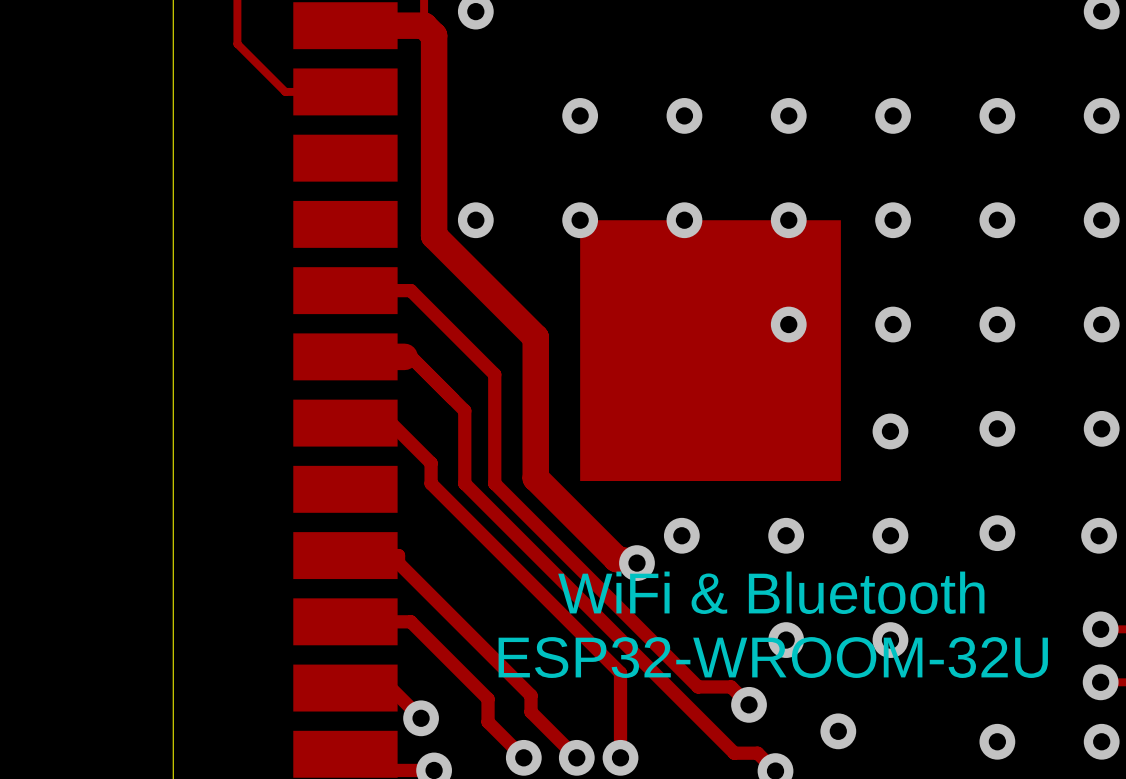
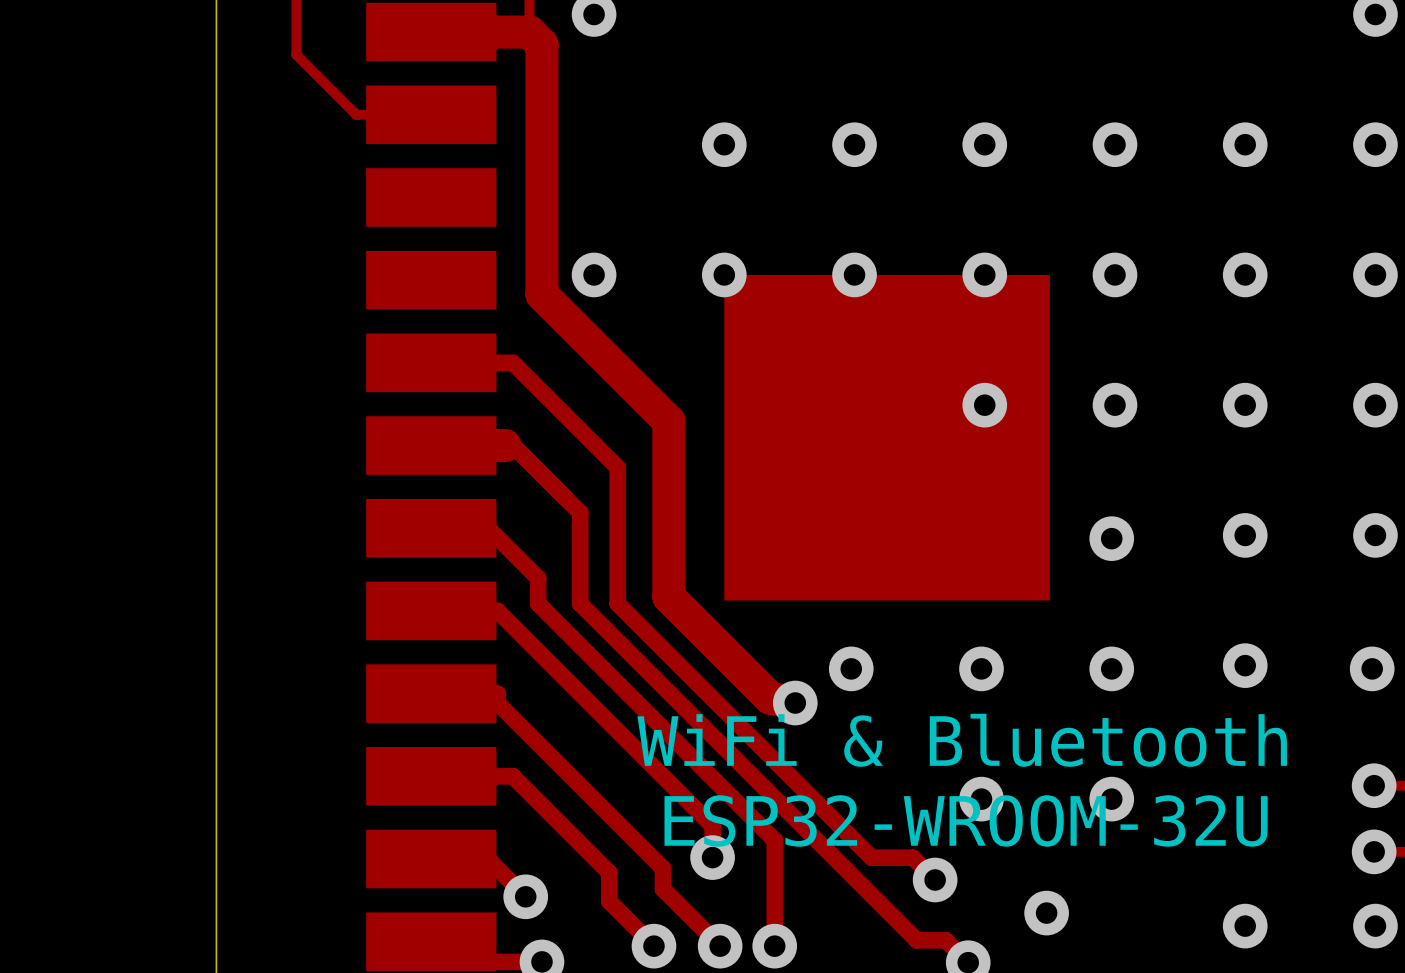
track: none -> (431, 610) (497, 610) (712, 826) (712, 857)
via: none -> (712, 857)

